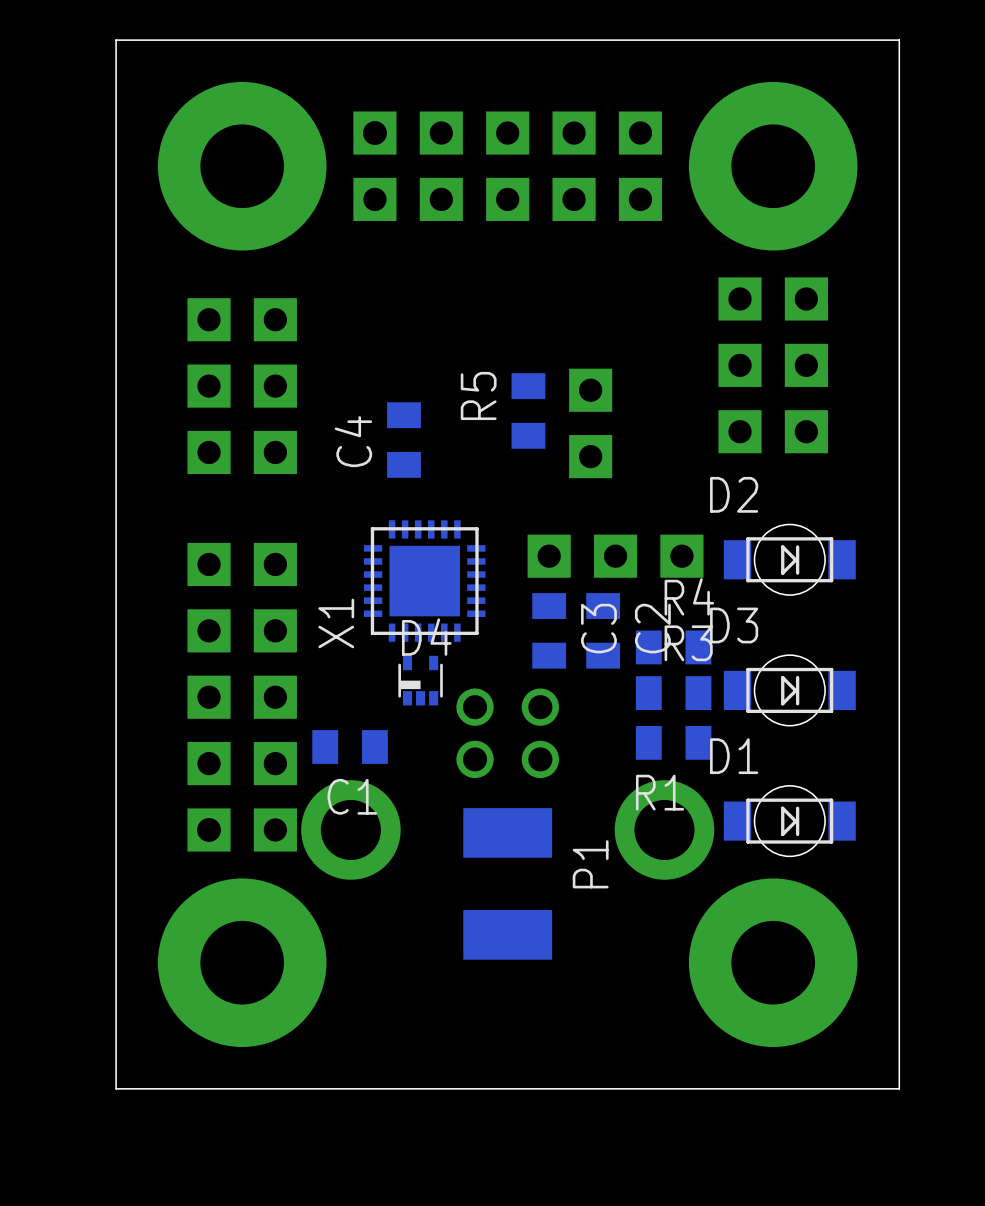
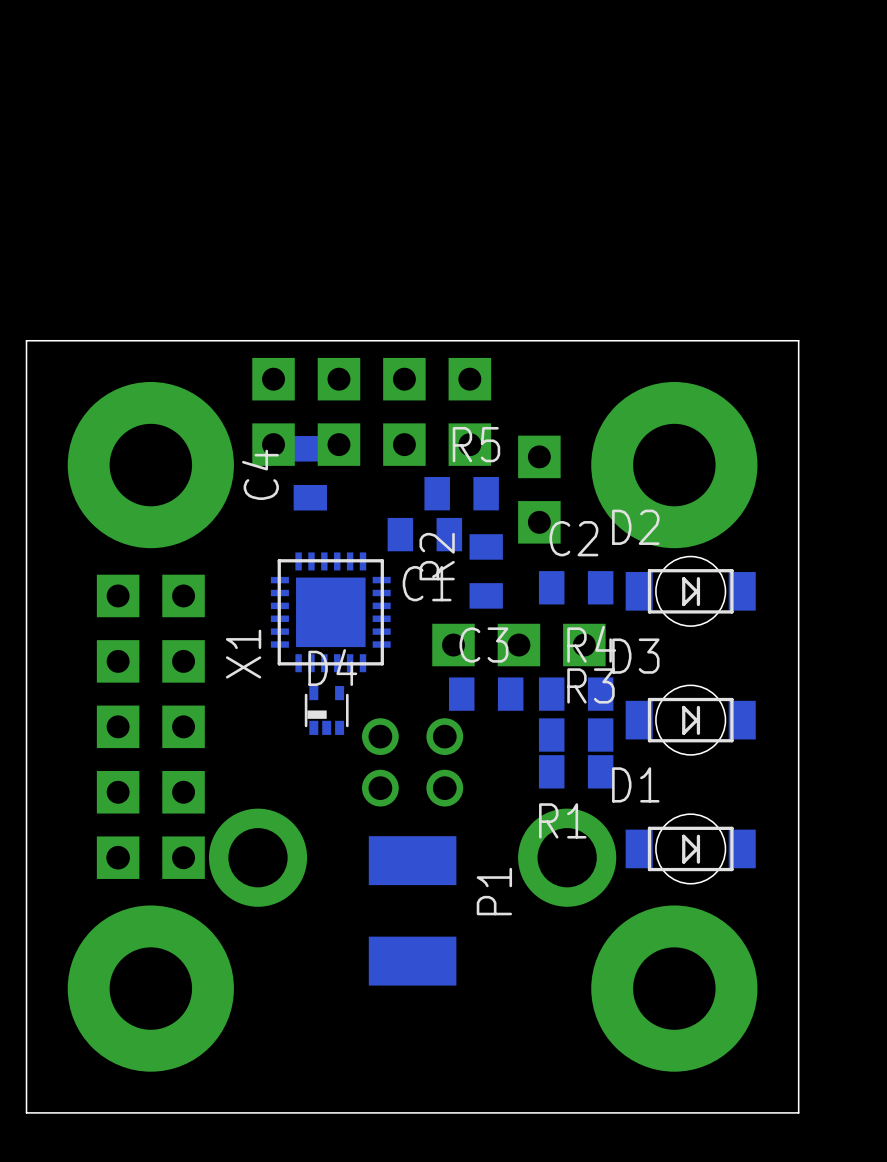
part position: (242, 166) -> (150, 465)
part: (507, 166) -> none
part position: (773, 166) -> (674, 465)
board edge: (899, 305) (899, 40) (116, 40) (116, 305) -> (798, 340) (26, 340)
part: (773, 365) -> none
part: none -> (371, 411)
part: (242, 386) -> none
R5 rotation: 0° (528, 410) -> 90° clockwise (461, 493)
R5 position: (528, 410) -> (461, 493)
part position: (590, 423) -> (539, 489)
R2: none -> (486, 571)
part position: (615, 556) -> (518, 645)
C3 name position: C3 (598, 628) -> C3 (483, 645)
C2 name position: C2 (652, 628) -> C2 (573, 538)
C3 rotation: 0° (549, 630) -> 90° clockwise (486, 694)
C3 position: (549, 630) -> (486, 694)
C2 rotation: 0° (603, 630) -> 90° clockwise (576, 587)
C2 position: (603, 630) -> (576, 587)
R4 position: (673, 647) -> (576, 694)
R3 position: (673, 693) -> (576, 735)
C1 position: (350, 747) -> (424, 534)

